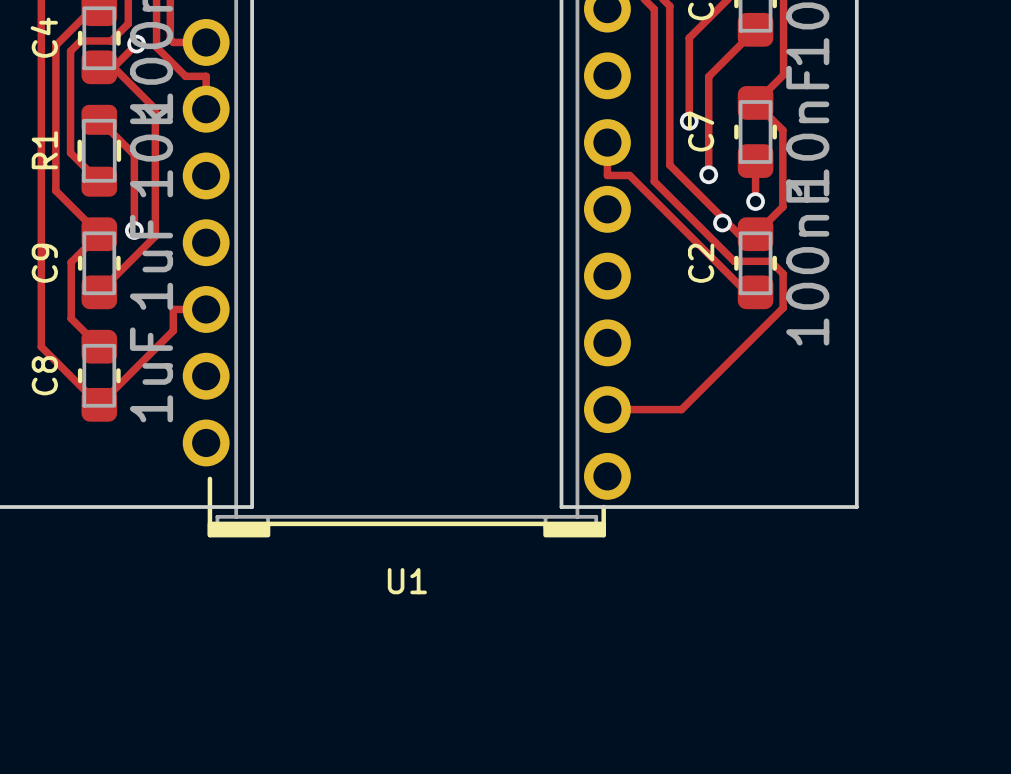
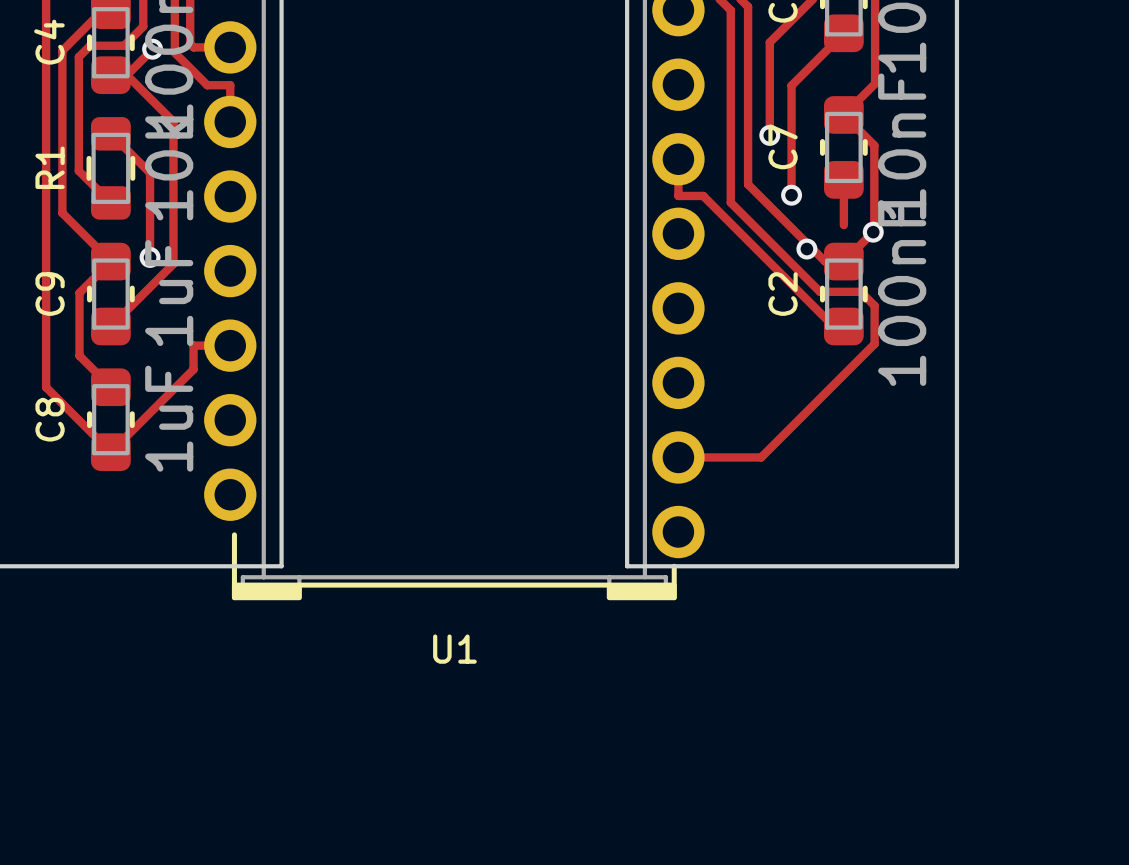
via position: (755, 201) -> (873, 232)

